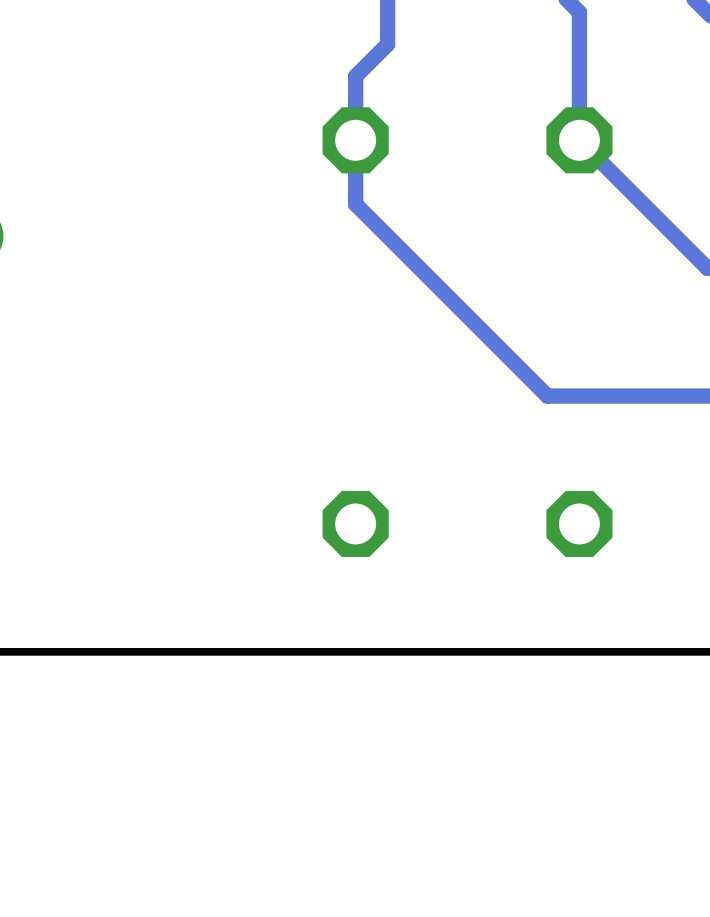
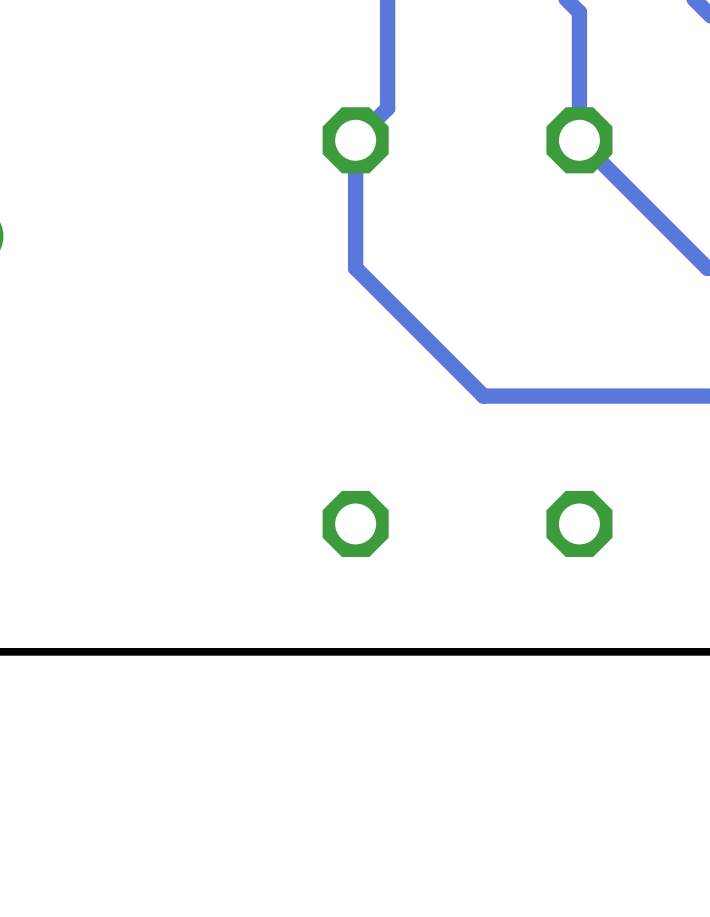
bottom track: (387, 44) (355, 76) (355, 140) -> (387, 44) (387, 108) (355, 140)
bottom track: (355, 204) (547, 396) -> (355, 204) (355, 268) (483, 396) (547, 396)

